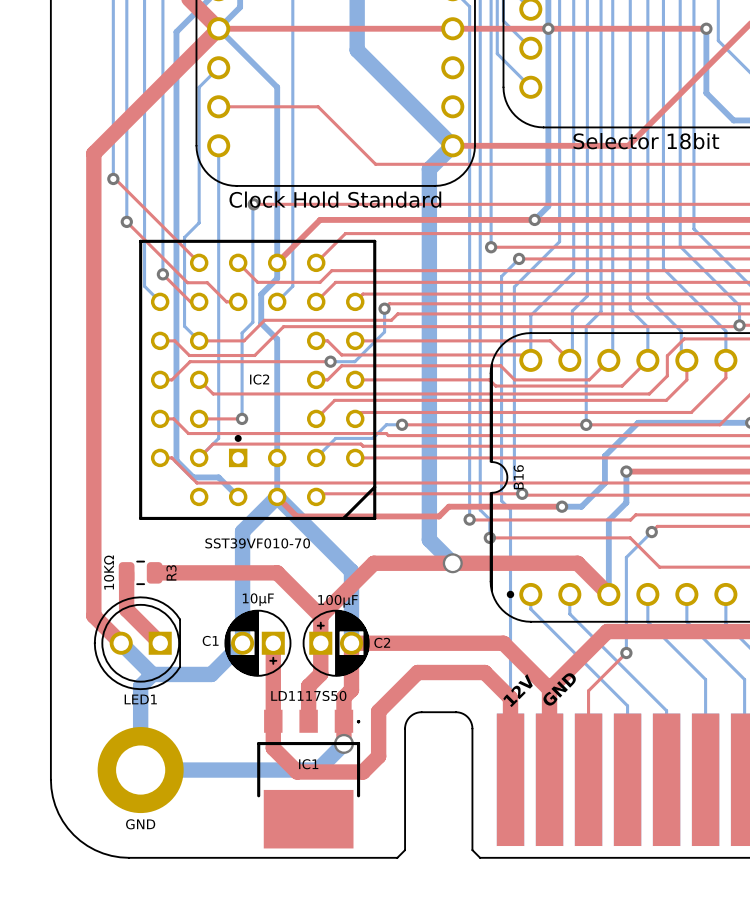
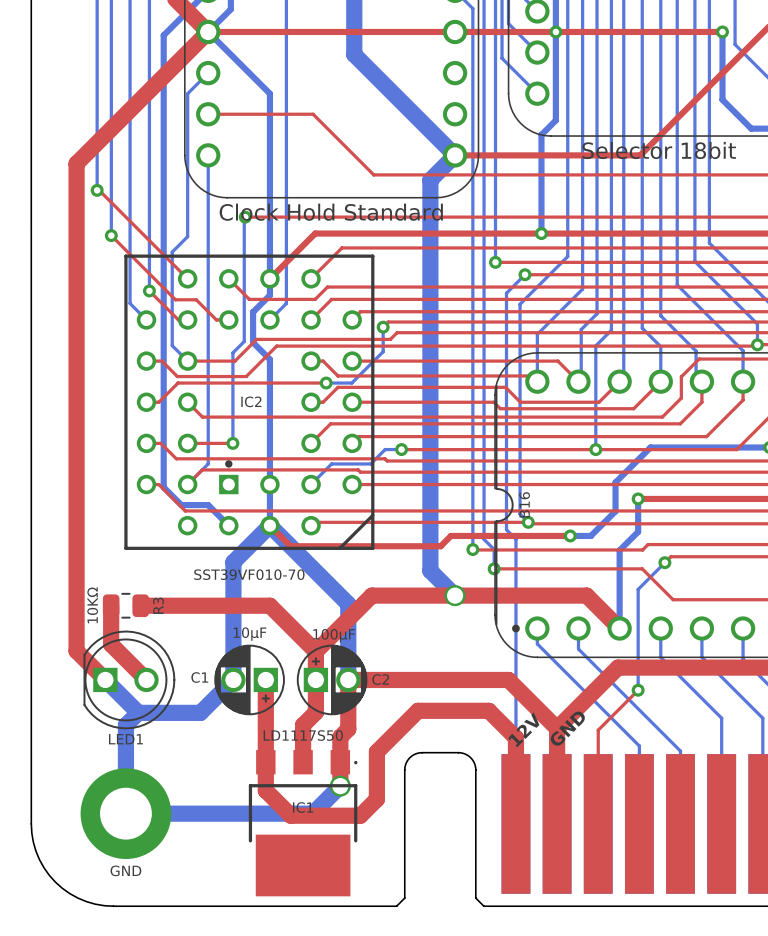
bottom track: (548, 112) (548, 206) (534, 219) -> (555, 120) (541, 134) (541, 233)
LED1 rotation: 0° (137, 643) -> 180° (129, 679)

